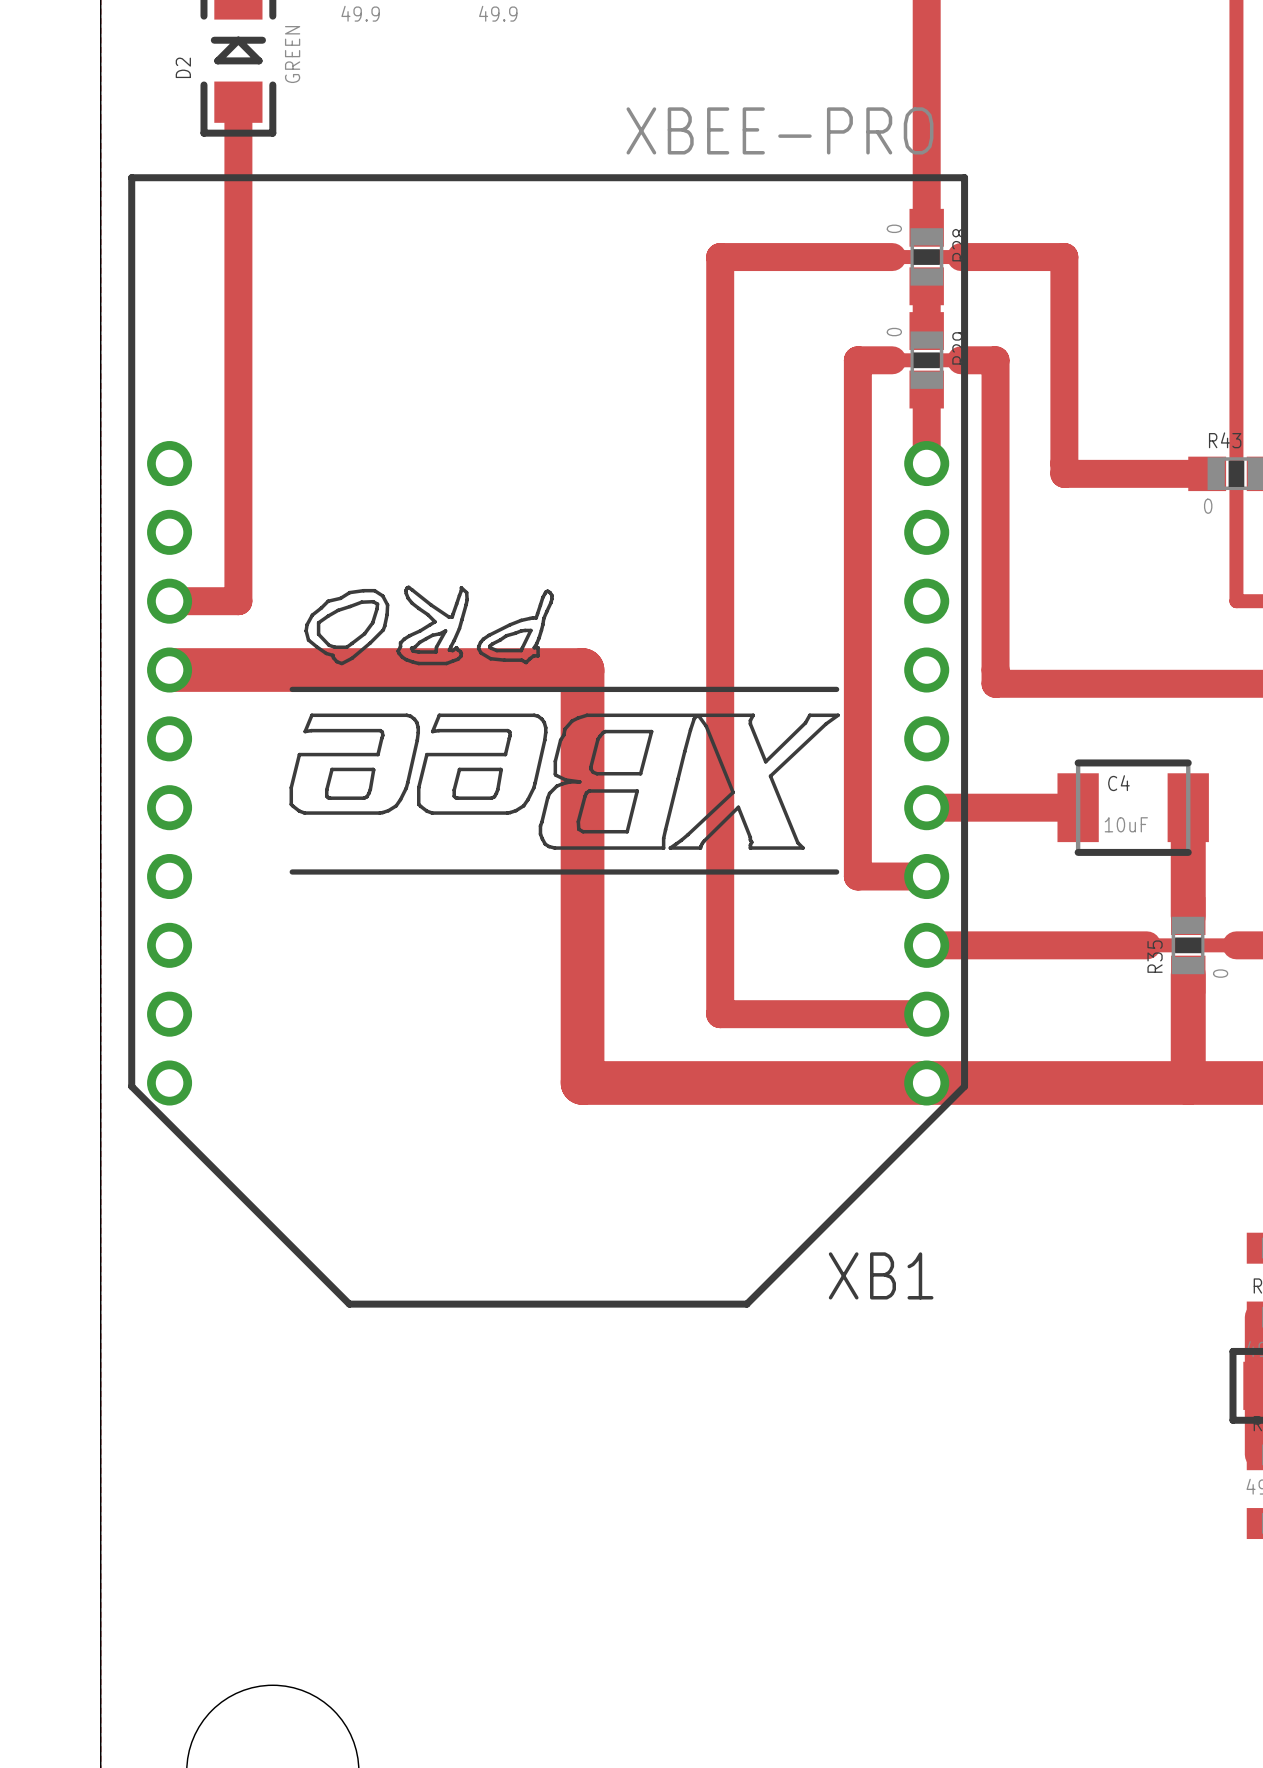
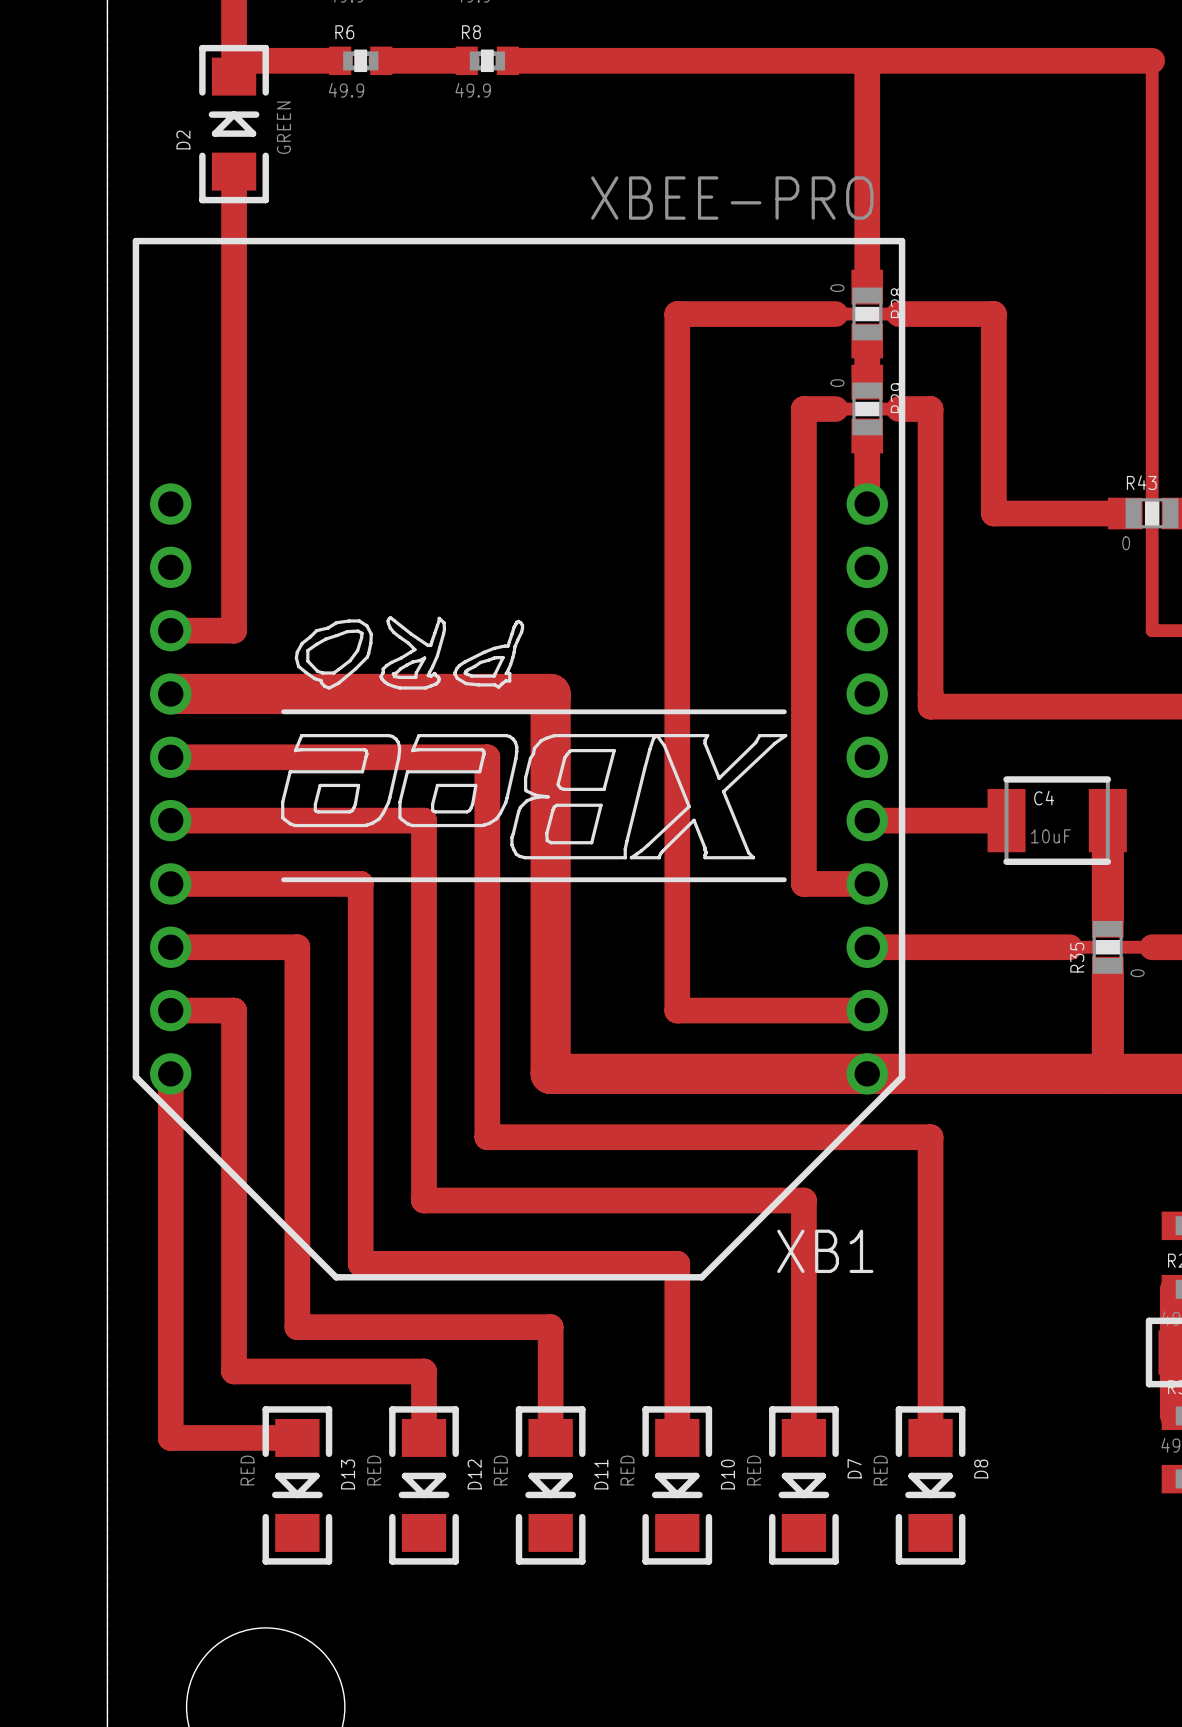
track: none -> (170, 757) (487, 757) (487, 1137) (930, 1137) (930, 1437)
track: none -> (170, 820) (424, 820) (424, 1200) (803, 1200) (803, 1437)
track: none -> (170, 883) (360, 883) (360, 1263) (677, 1263) (677, 1437)
track: none -> (170, 947) (297, 947) (297, 1327) (550, 1327) (550, 1437)
track: none -> (170, 1010) (234, 1010) (234, 1371) (424, 1371) (424, 1437)
track: none -> (170, 1073) (170, 1437) (297, 1437)
D13: none -> RED (297, 1485)
D12: none -> RED (424, 1485)
D11: none -> RED (550, 1485)
D10: none -> RED (677, 1485)
D7: none -> RED (803, 1485)
D8: none -> RED (930, 1485)

